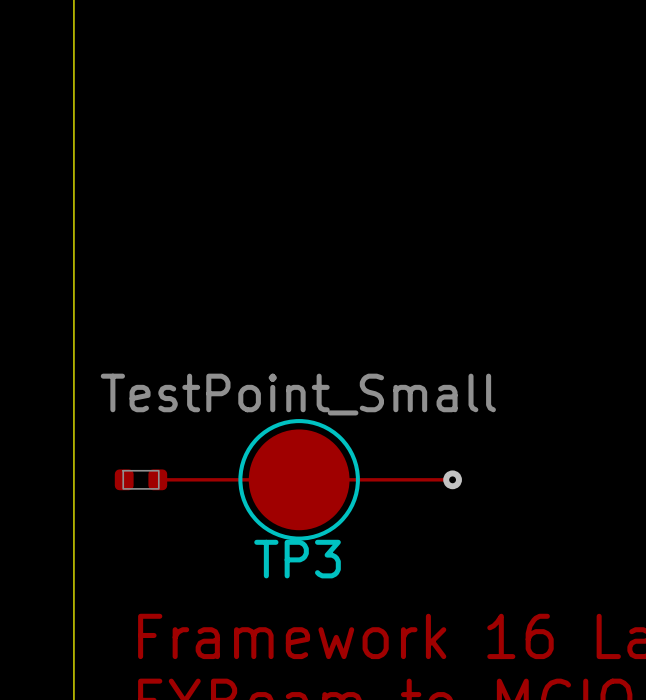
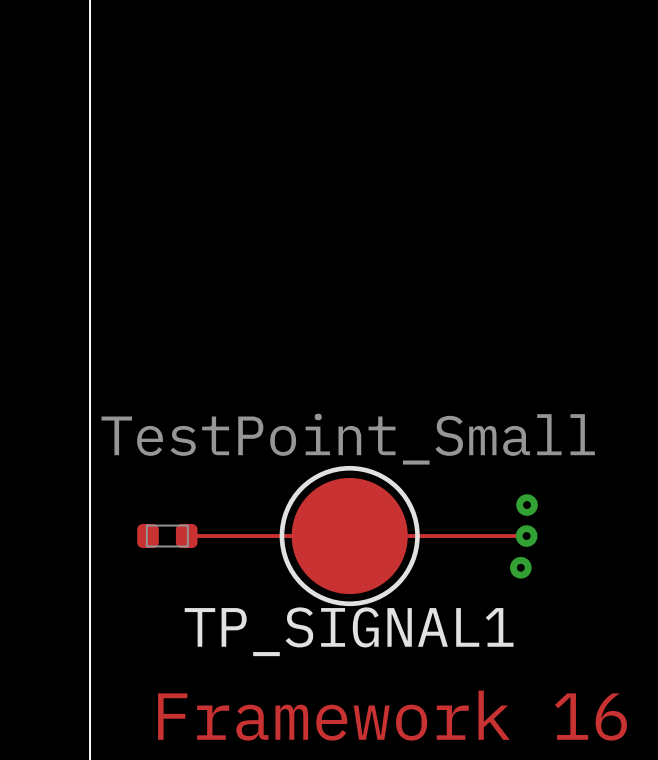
via: none -> (527, 505)
via: none -> (520, 567)
TP3 name: TP3 (297, 559) -> TP_SIGNAL1 (349, 631)

